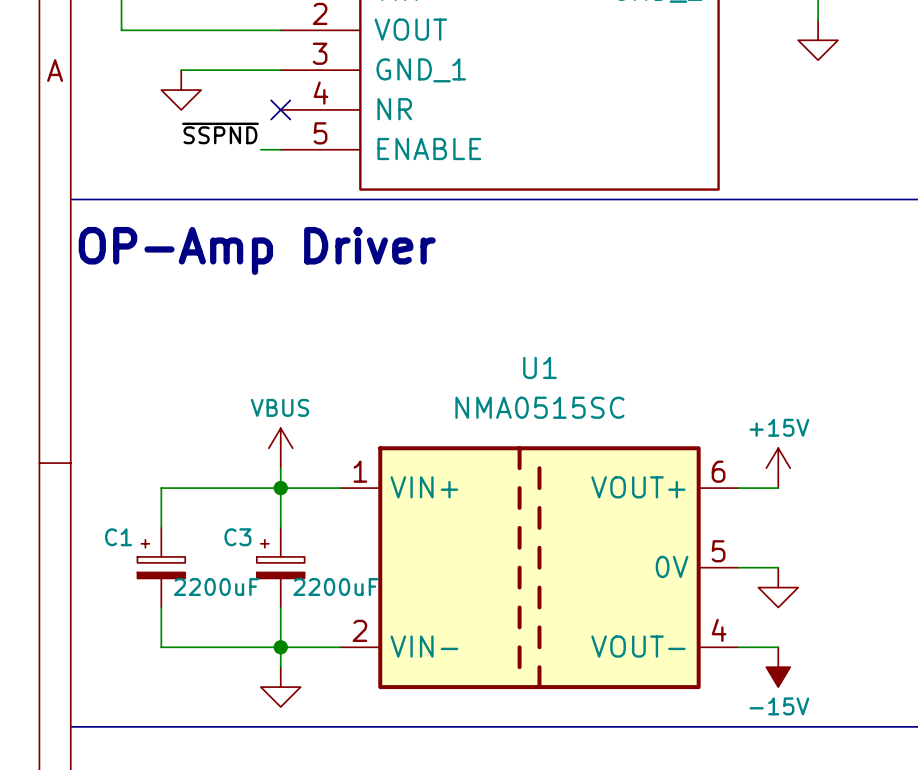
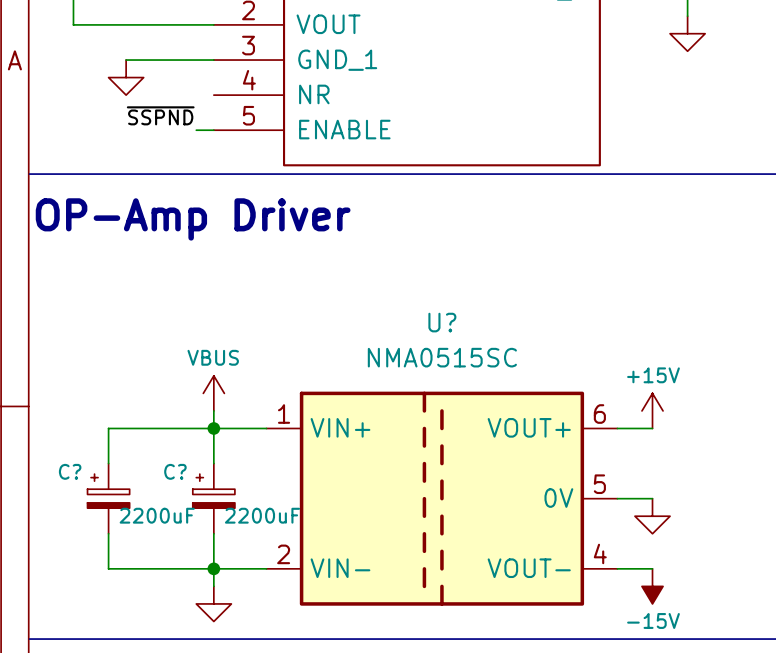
no-connect mark: (280, 109) -> none
U1 name: U1 (539, 367) -> U? (442, 322)
C1 name: C1 (118, 537) -> C? (70, 471)
C3 name: C3 (237, 537) -> C? (175, 471)

